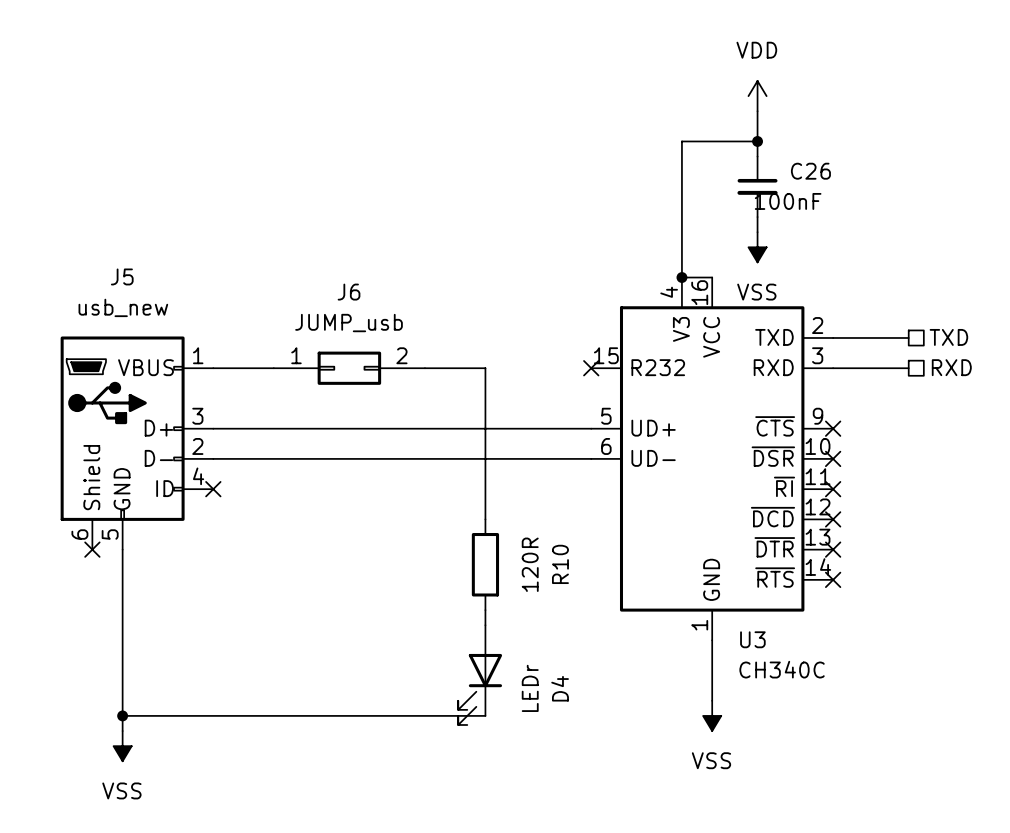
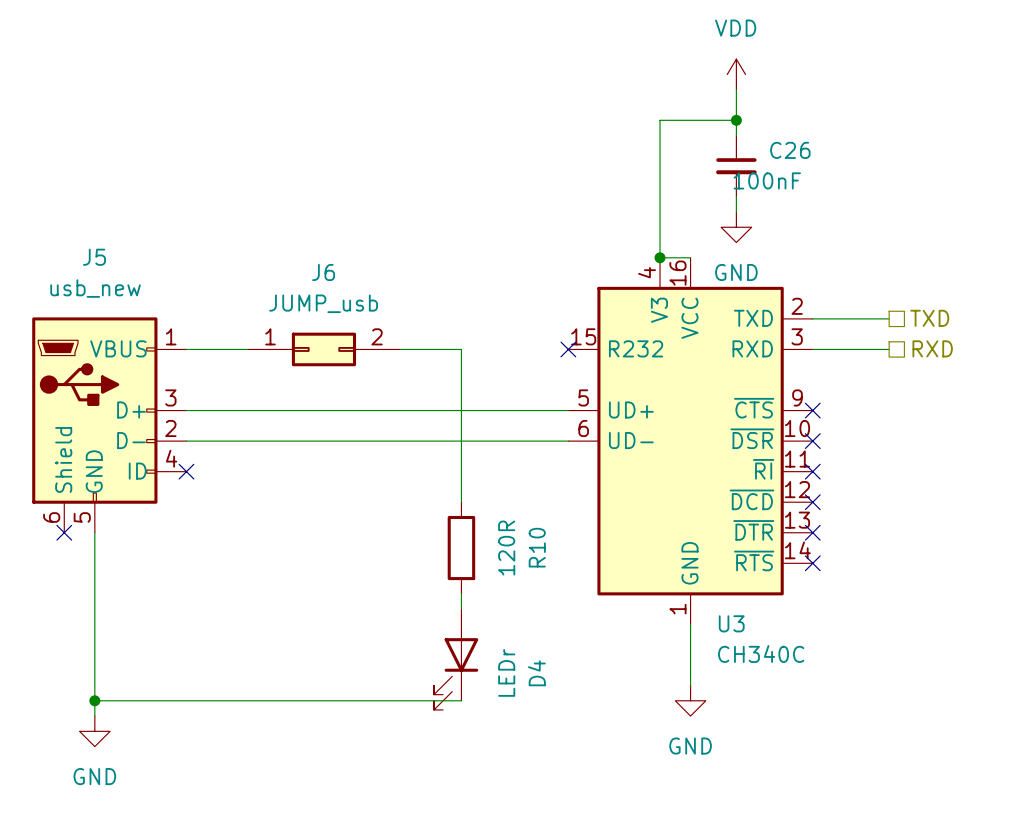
power symbol: VSS (757, 247) -> GND (736, 227)
power symbol: VSS (712, 715) -> GND (690, 700)
power symbol: VSS (122, 746) -> GND (94, 731)

